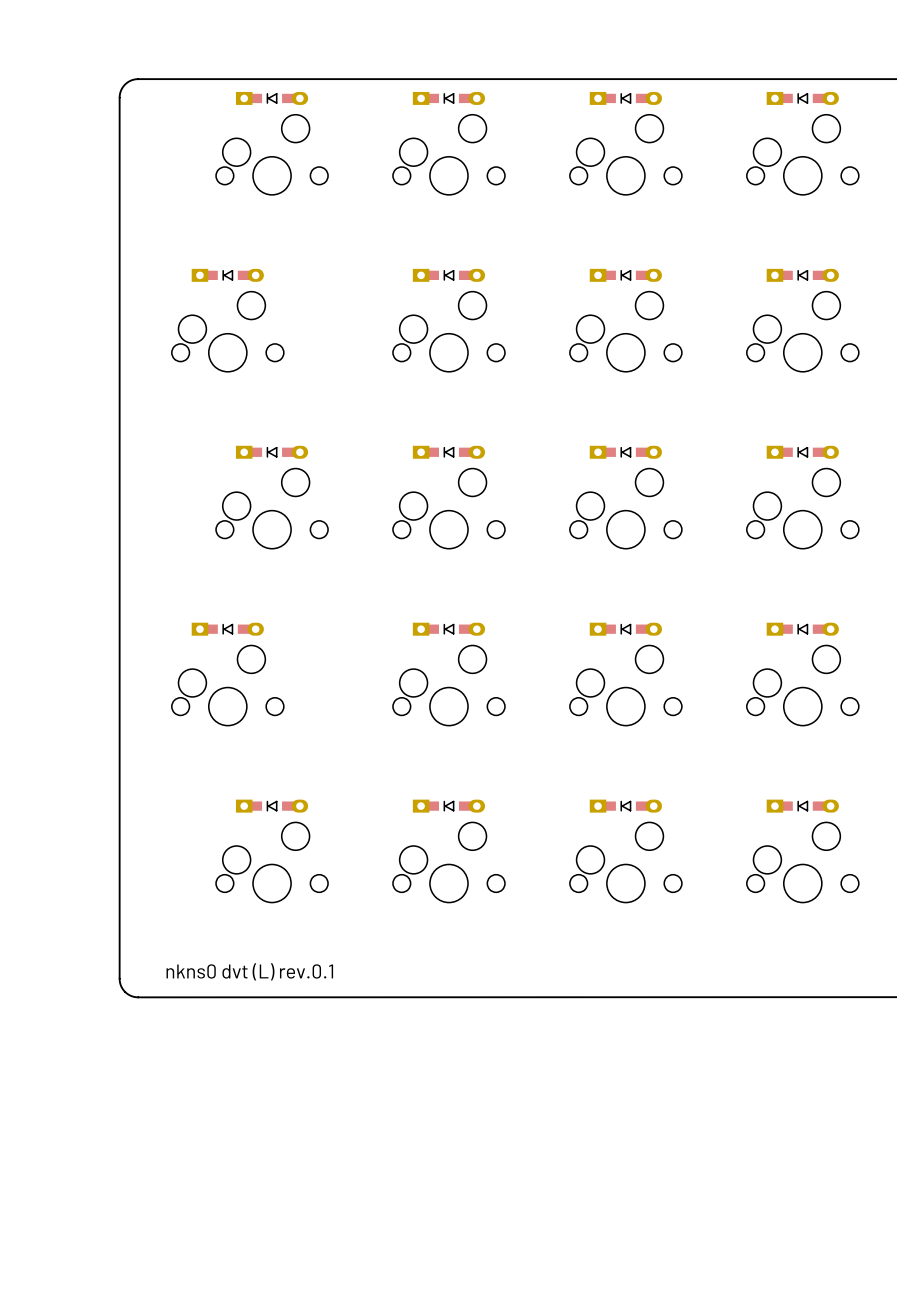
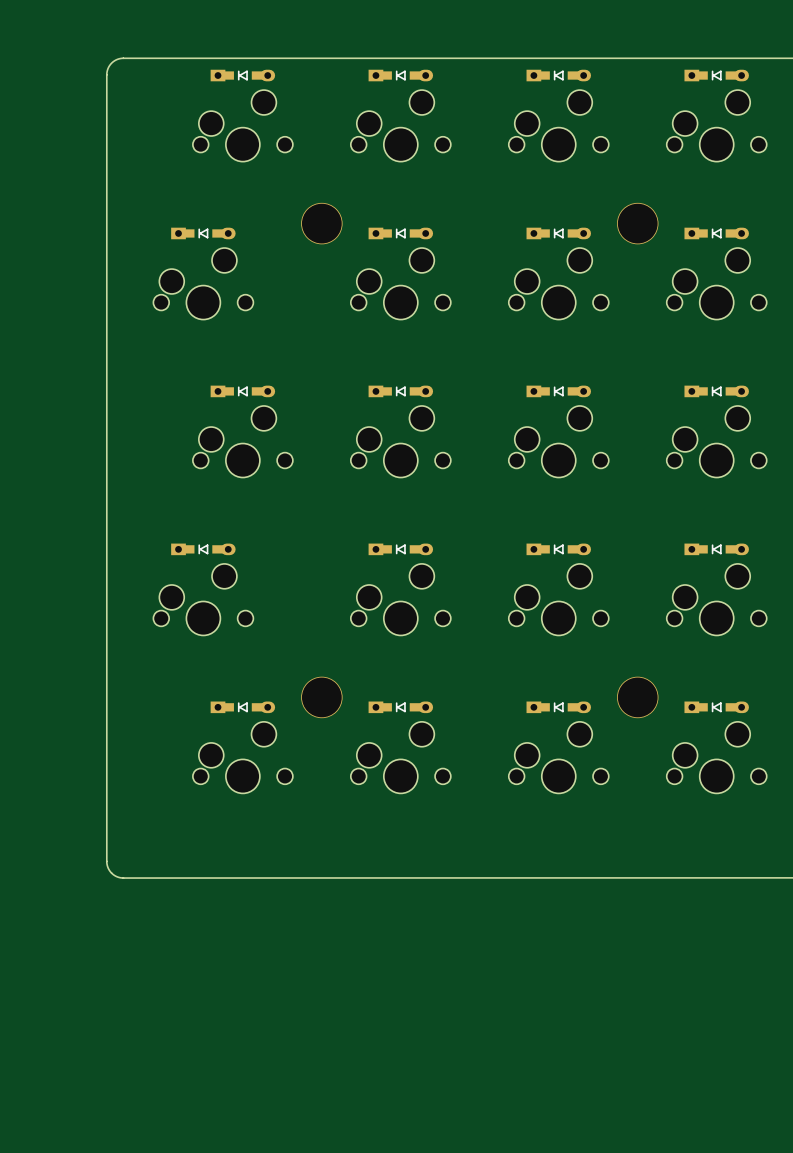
part: none -> (321, 223)
part: none -> (637, 223)
part: none -> (321, 697)
part: none -> (637, 697)
text: nkns0 dvt (L) rev.0.1 (249, 971) -> none

